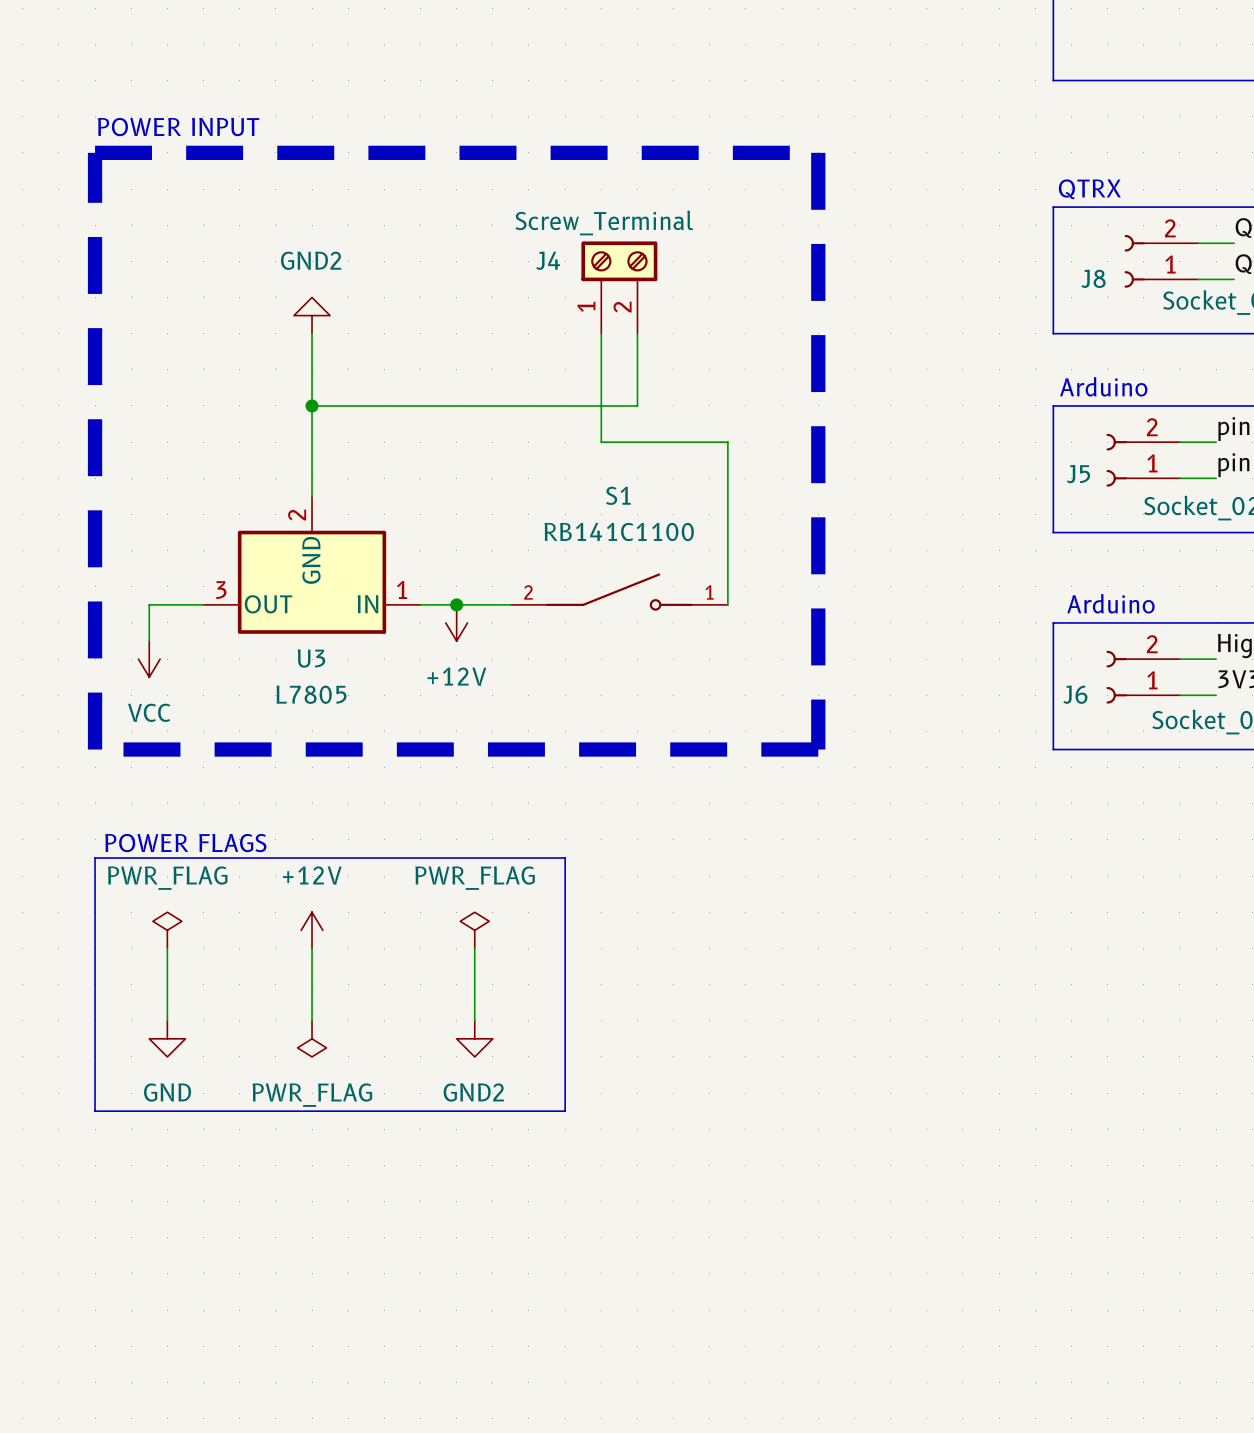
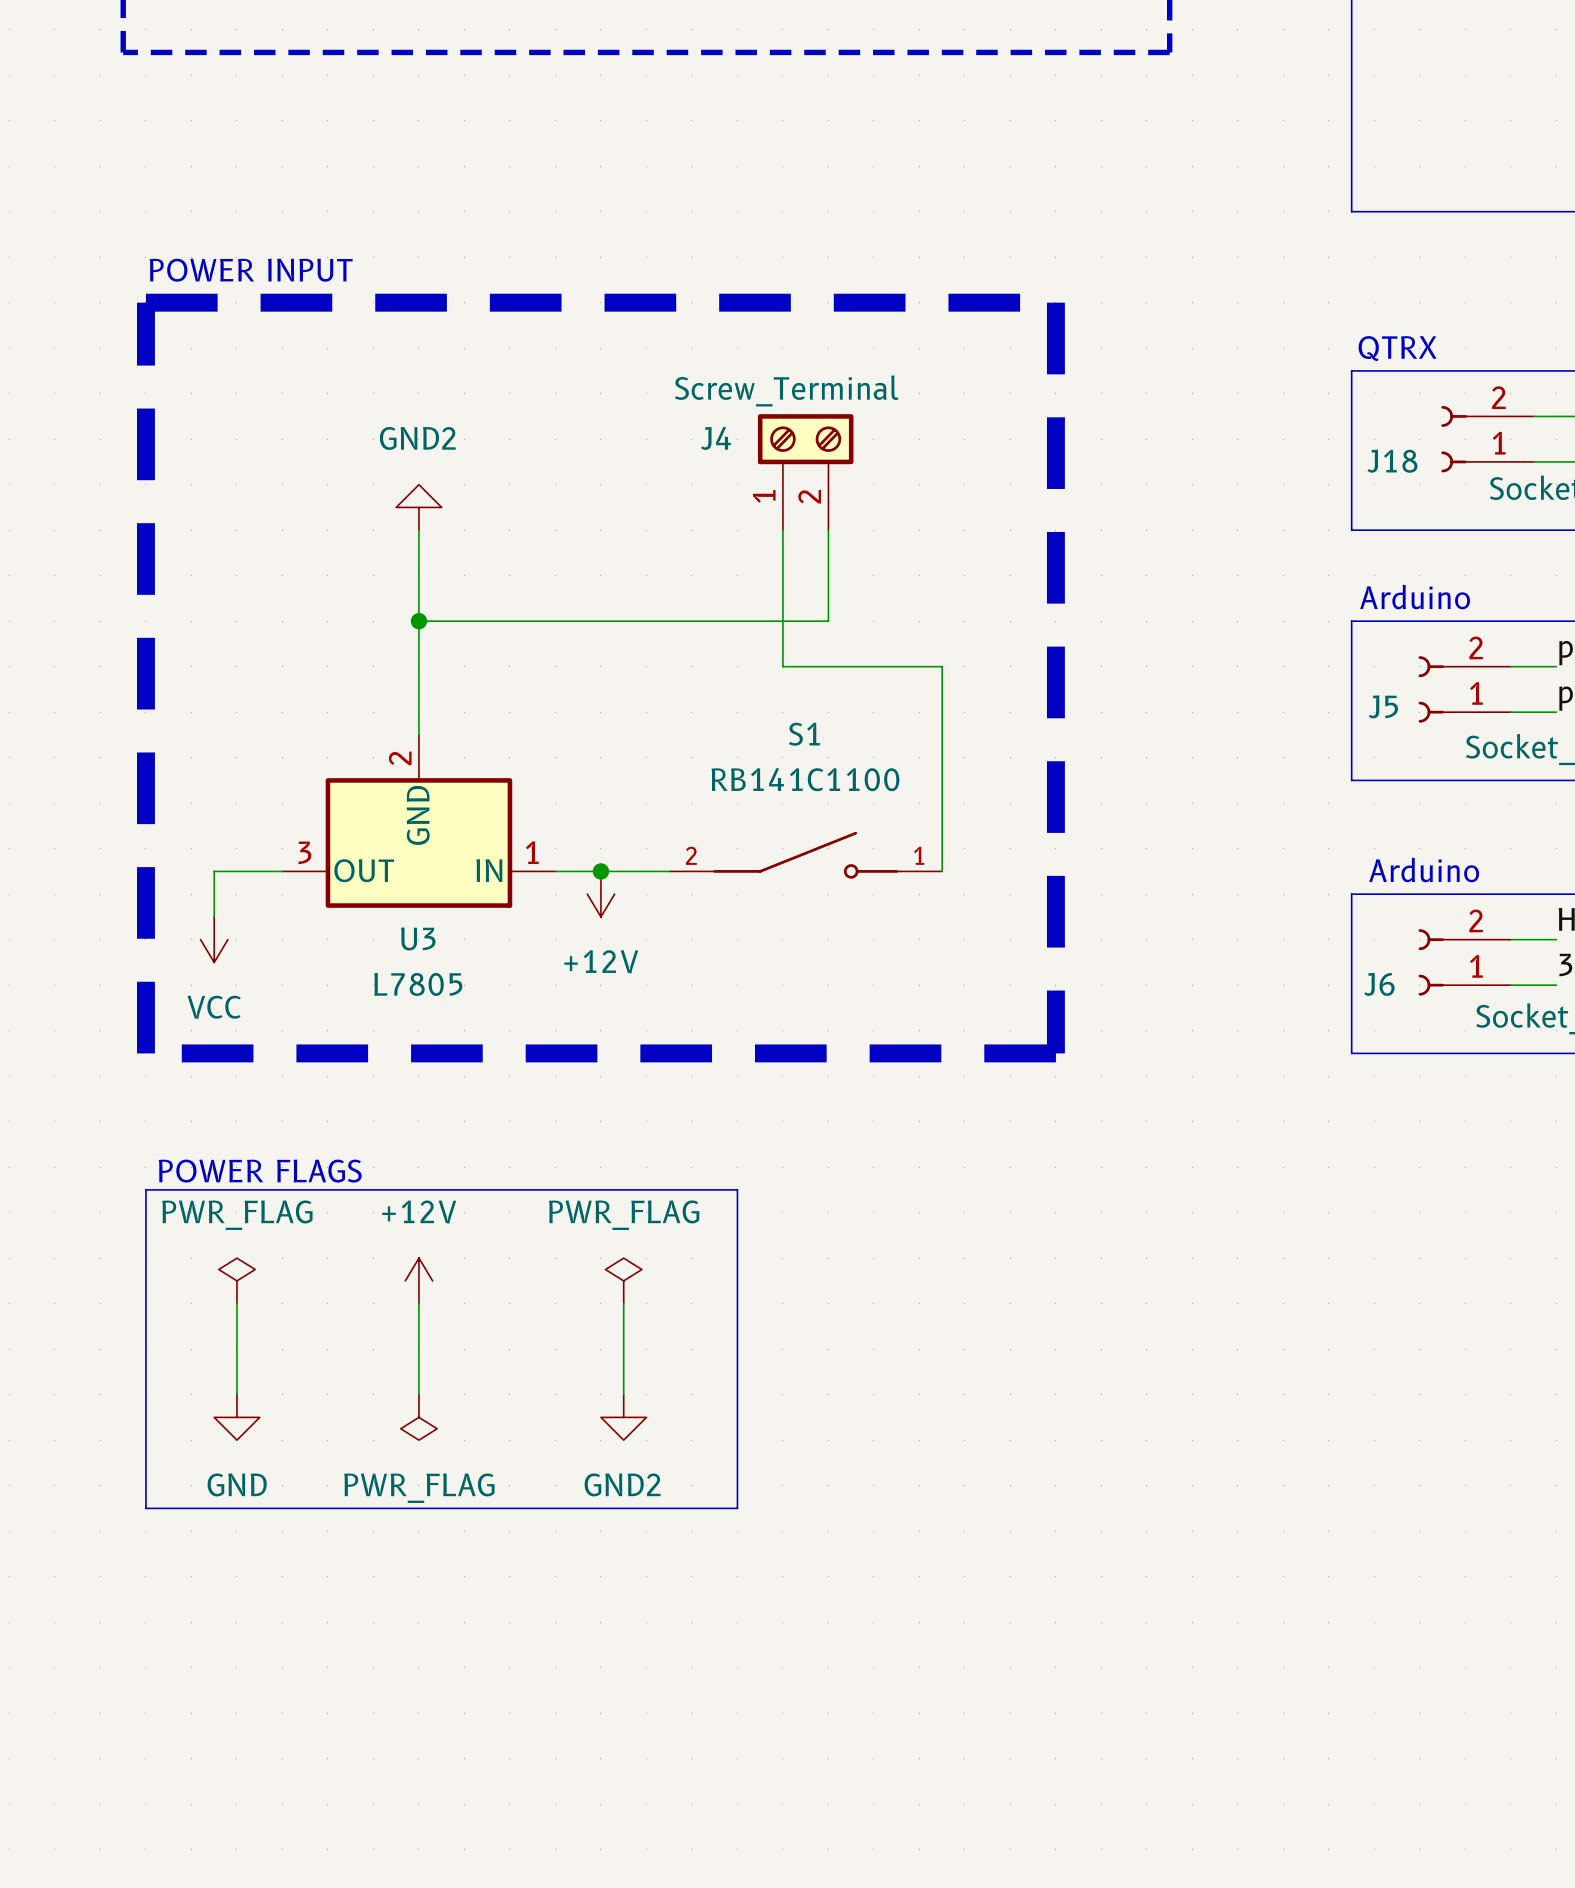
J8 name: J8 (1093, 278) -> J18 (1392, 461)

